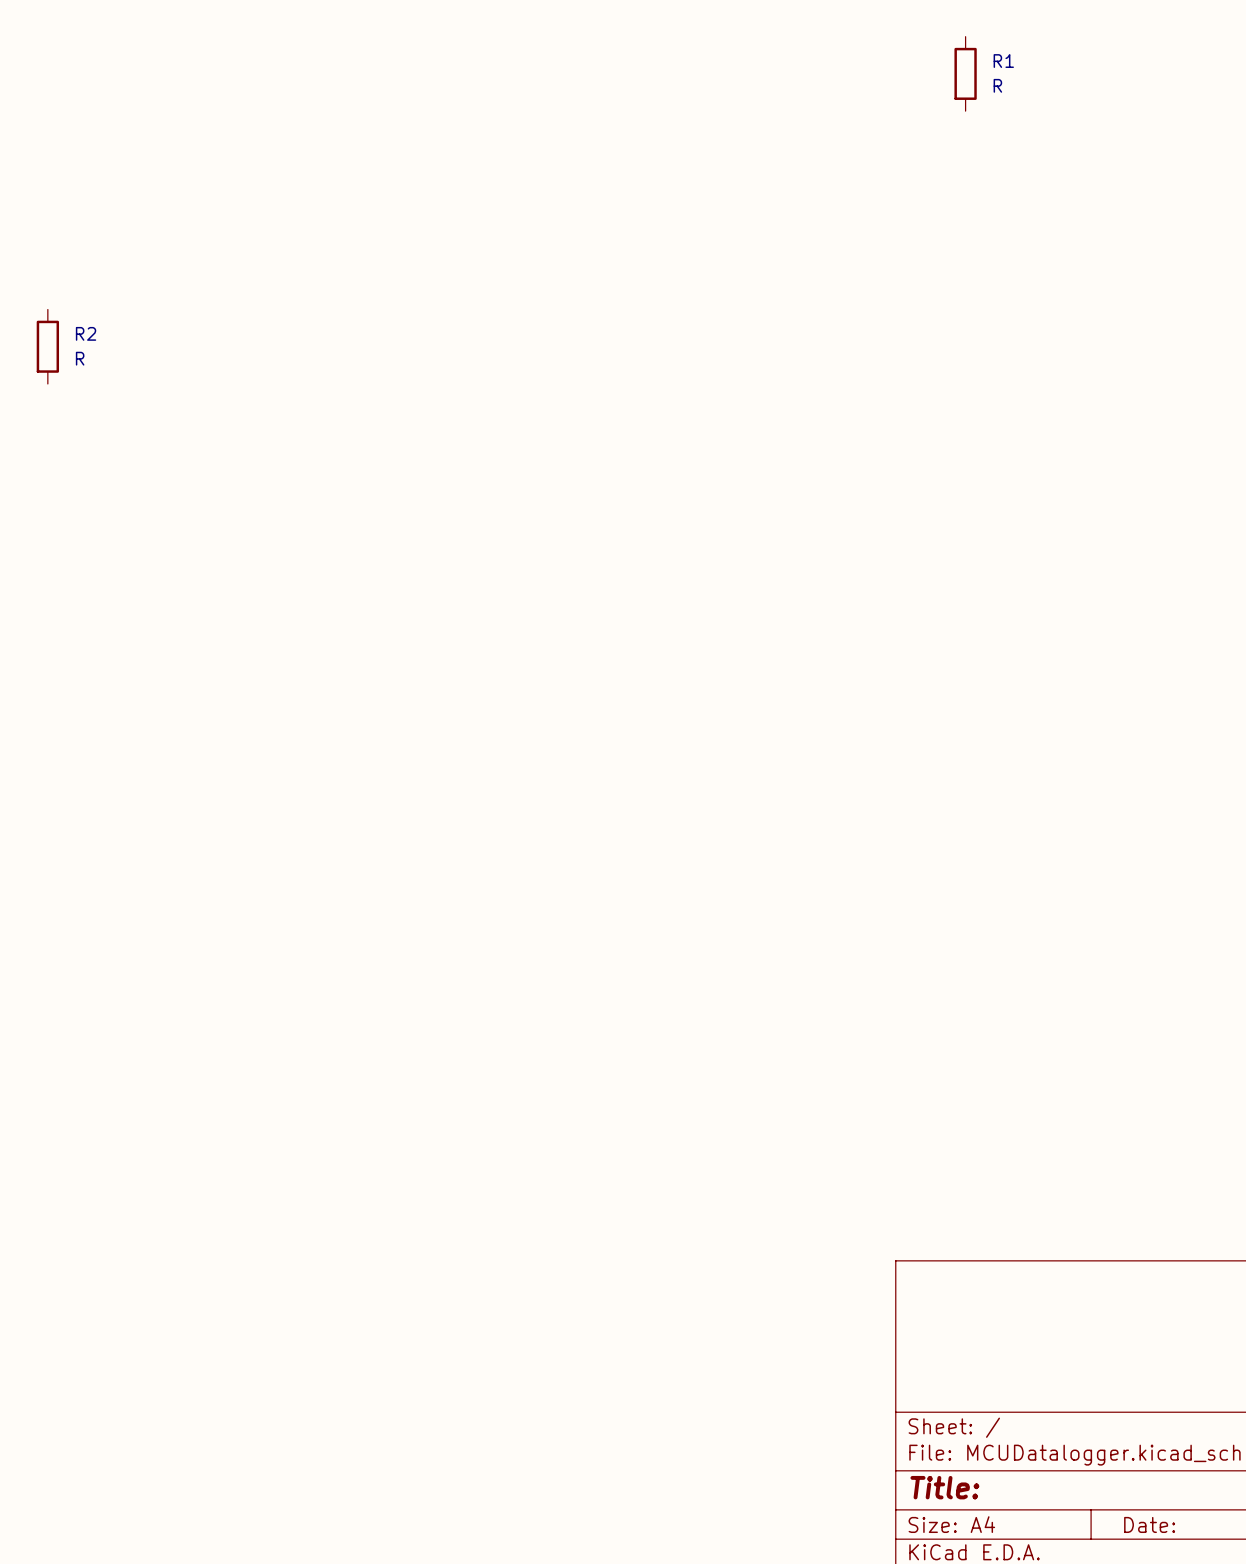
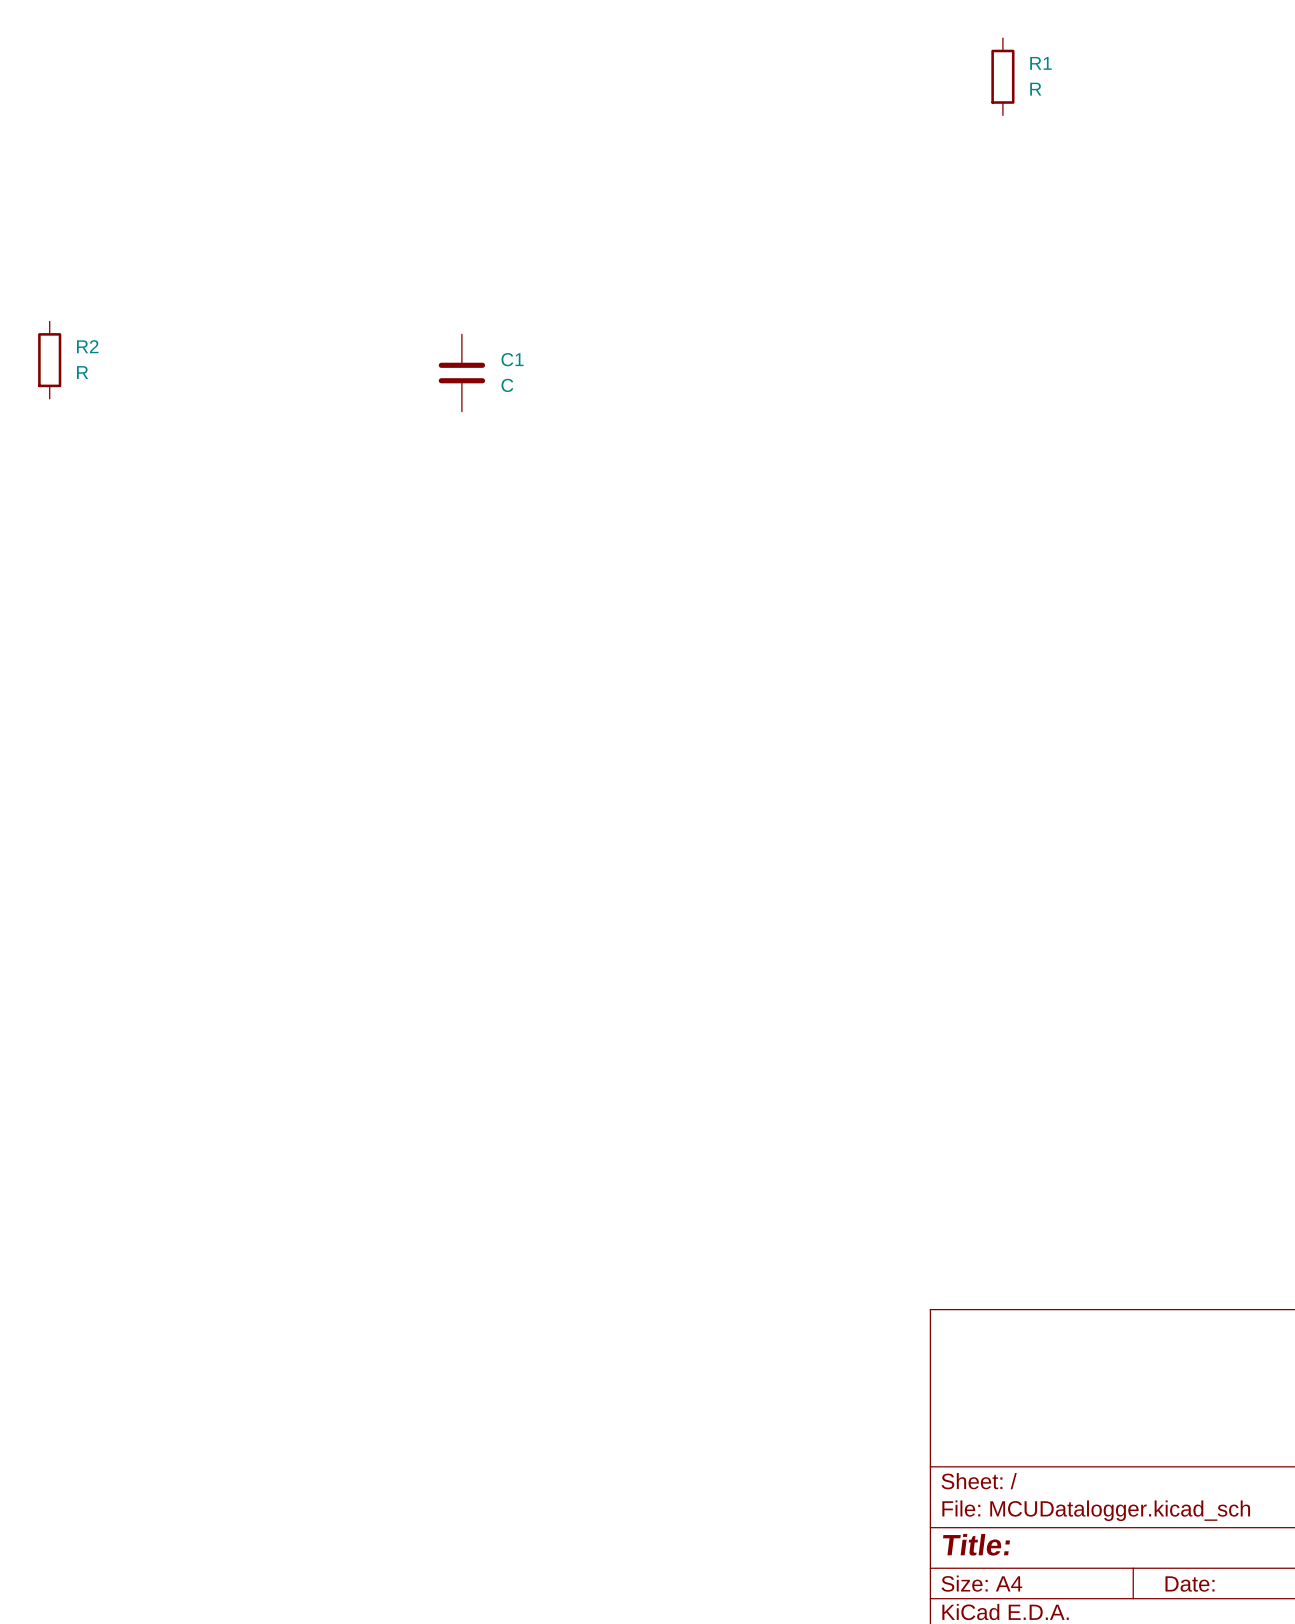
C1: none -> C (461, 373)

